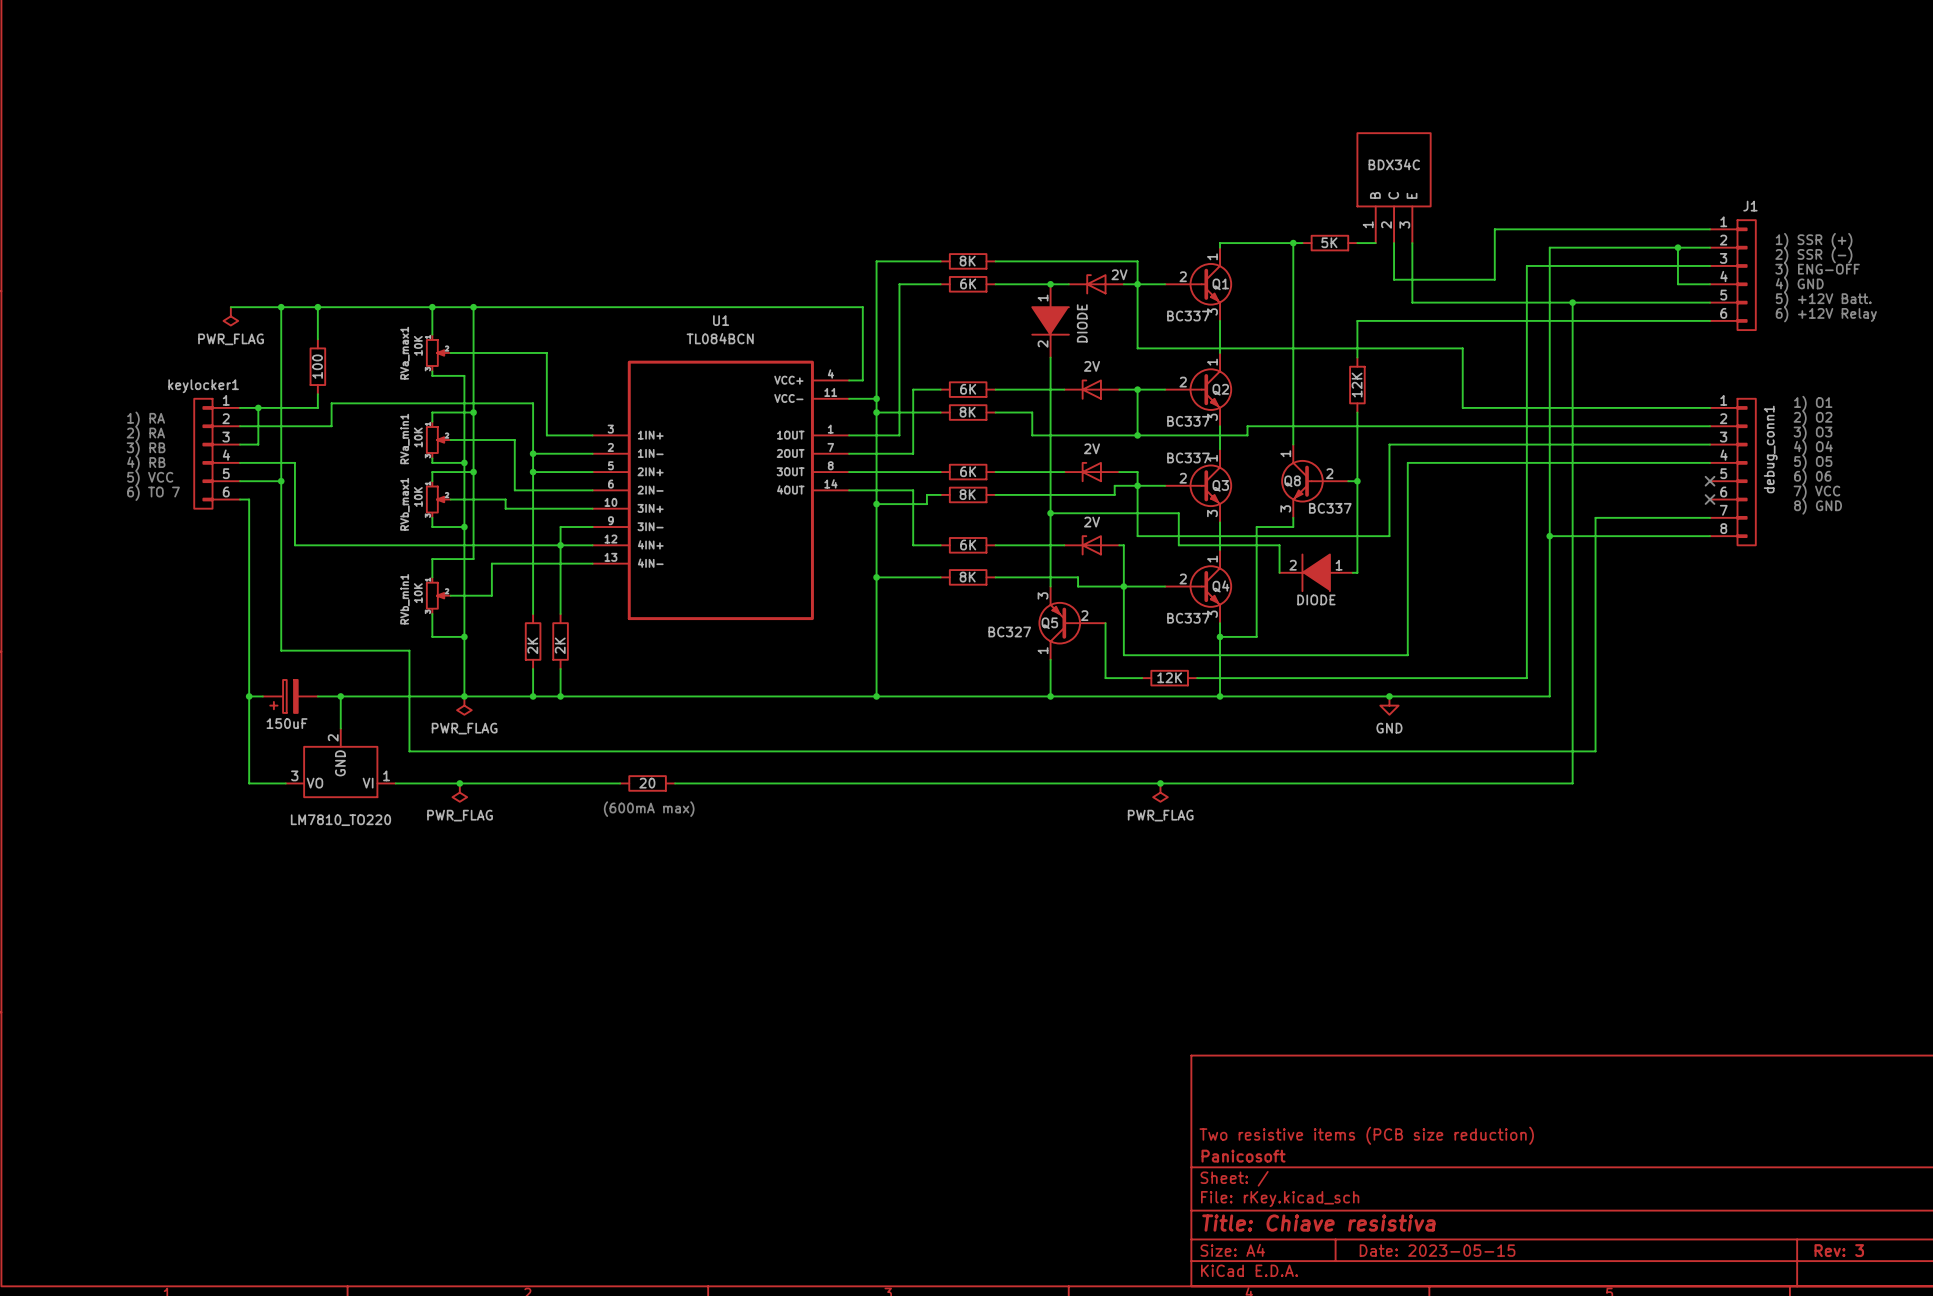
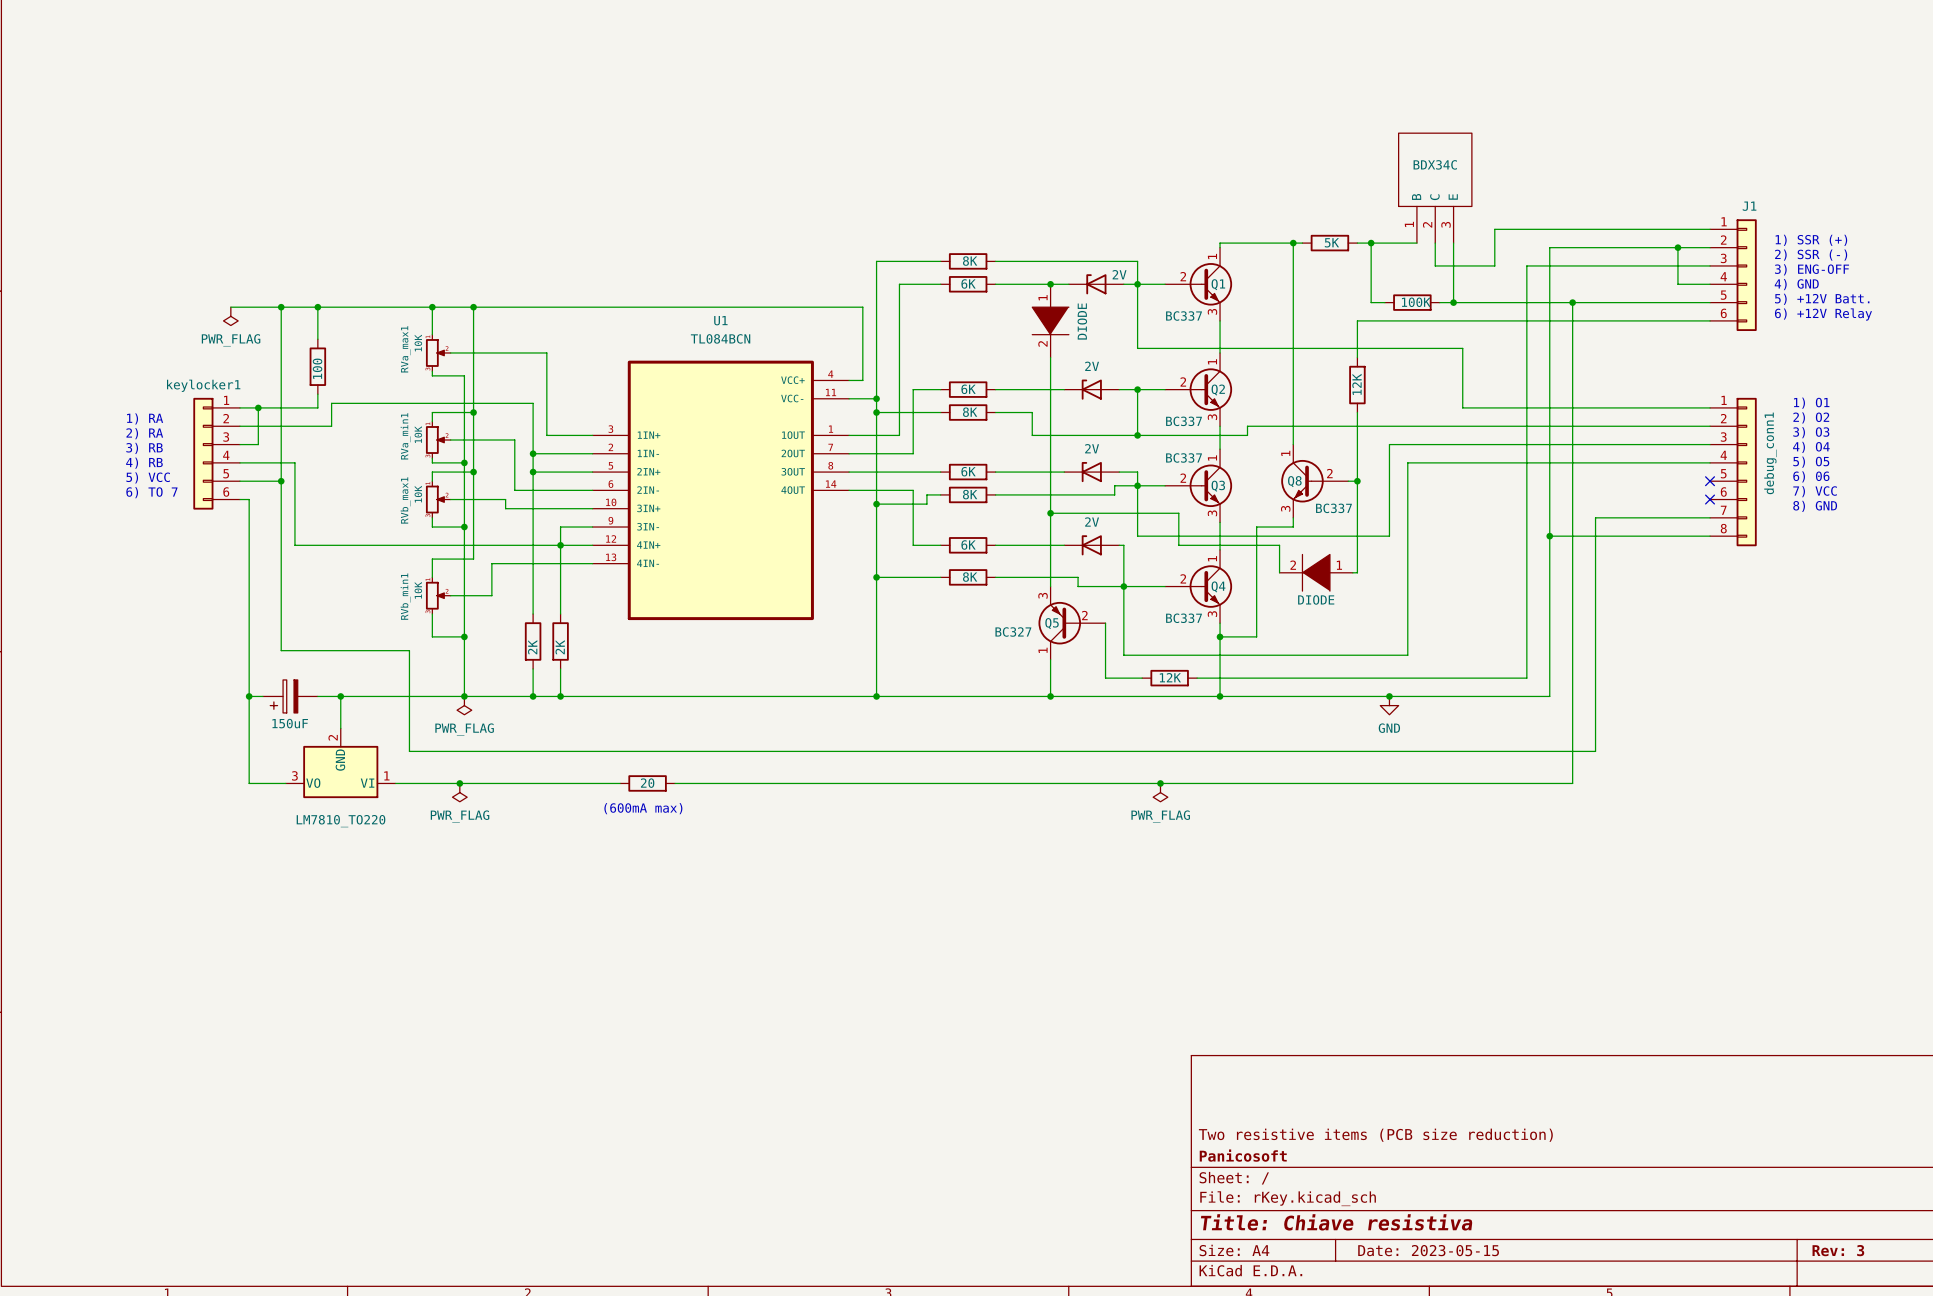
part position: (1394, 187) -> (1435, 187)
wire: none -> (1371, 243) (1371, 302) (1384, 302)
junction: none -> (1371, 243)
wire: none -> (1375, 243) (1416, 243)
wire: (1394, 243) (1394, 279) (1494, 279) (1494, 265) -> (1435, 243) (1435, 265) (1494, 265)
wire: (1412, 243) (1412, 302) (1439, 302) -> none
wire: none -> (1453, 243) (1453, 302)
part: none -> 100K (1412, 302)
junction: none -> (1453, 302)

